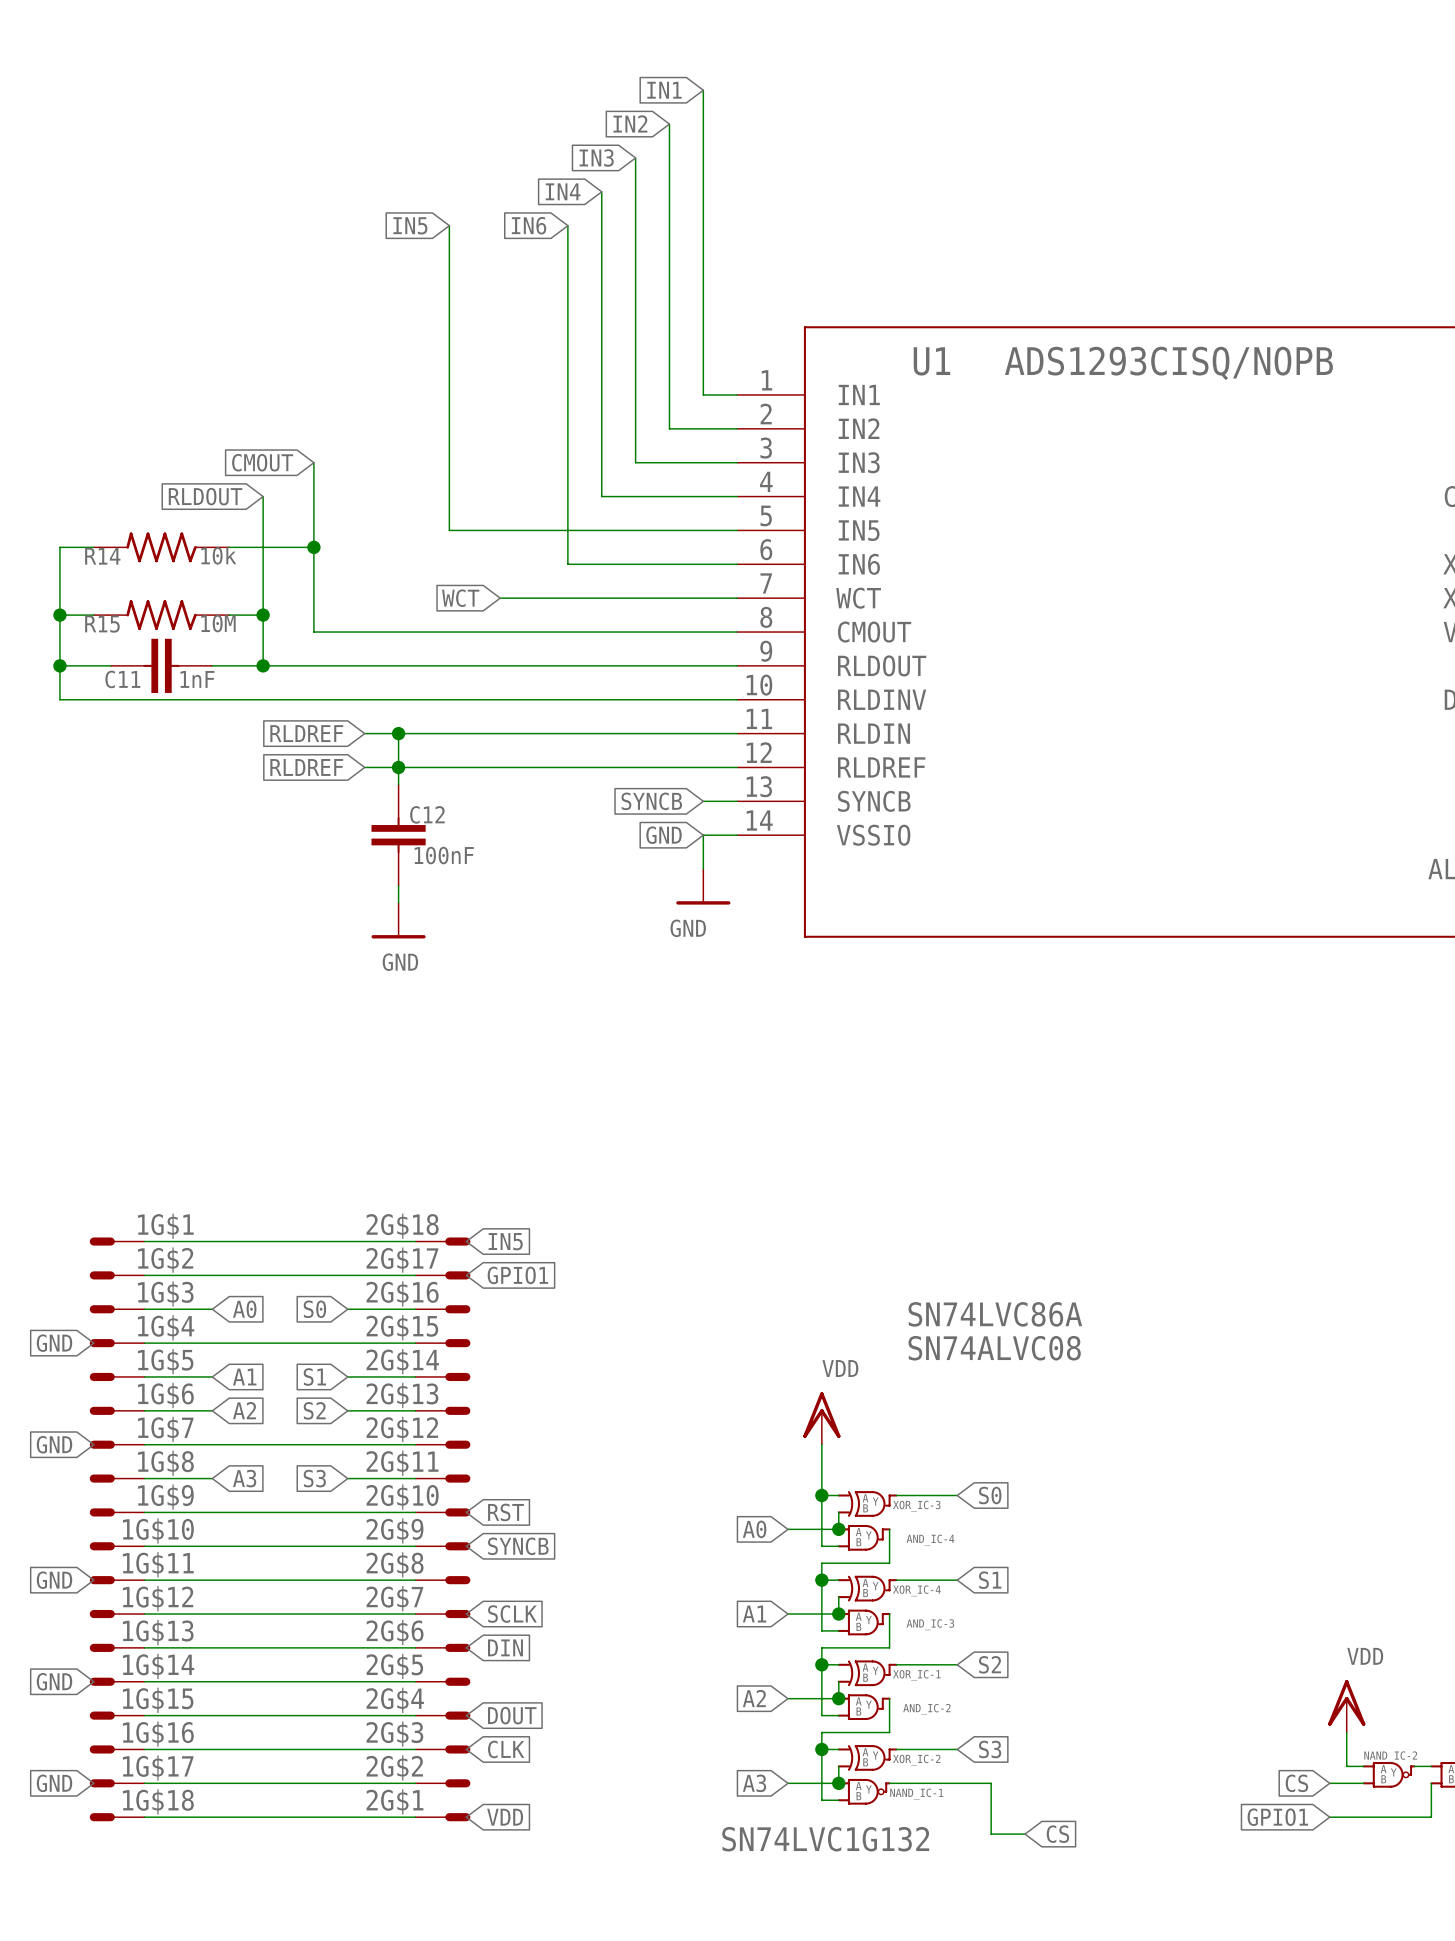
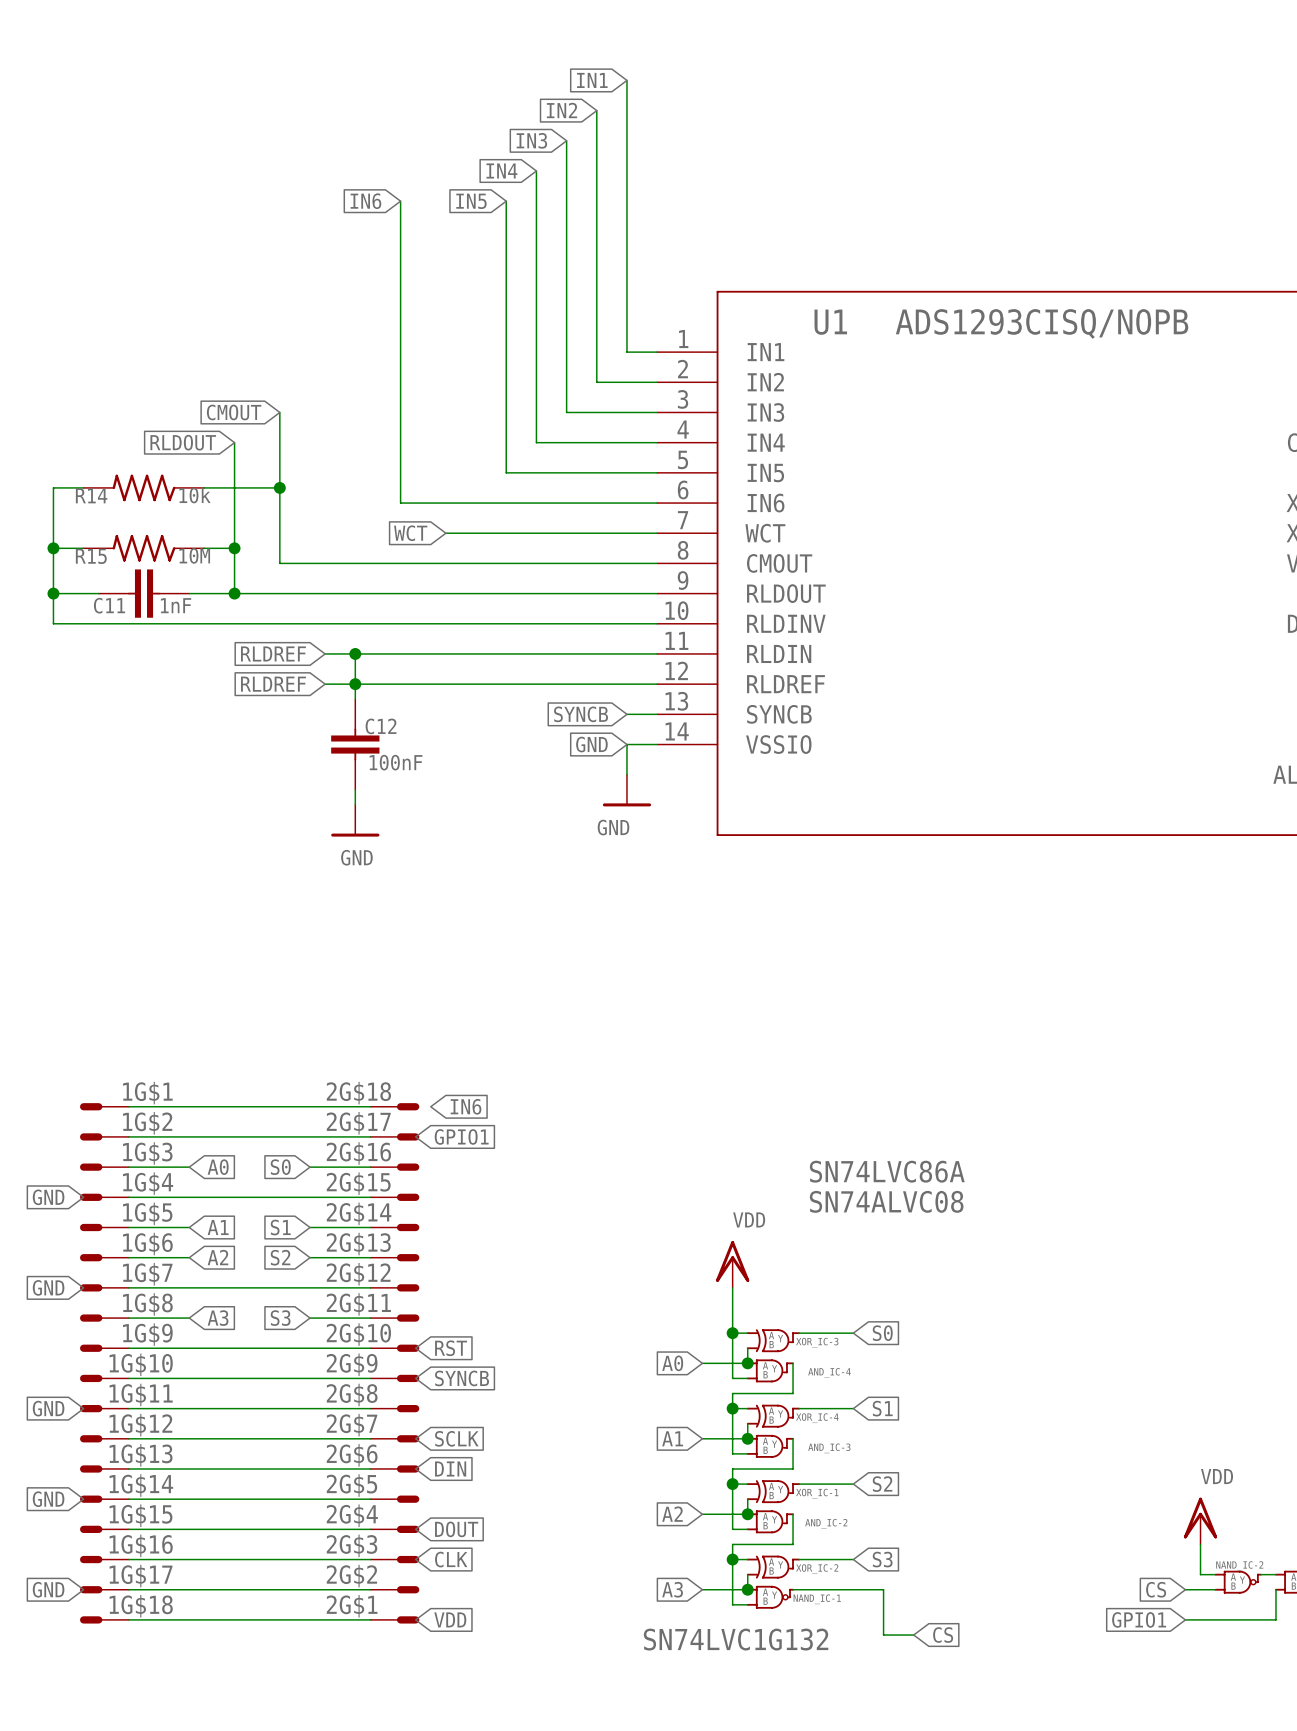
global label: IN5 (410, 225) -> IN6 (365, 201)
global label: IN6 (529, 225) -> IN5 (471, 201)
wire: (449, 530) (567, 530) (567, 564) -> (400, 472) (400, 503) (506, 503)
global label: IN5 (505, 1241) -> IN6 (466, 1106)

